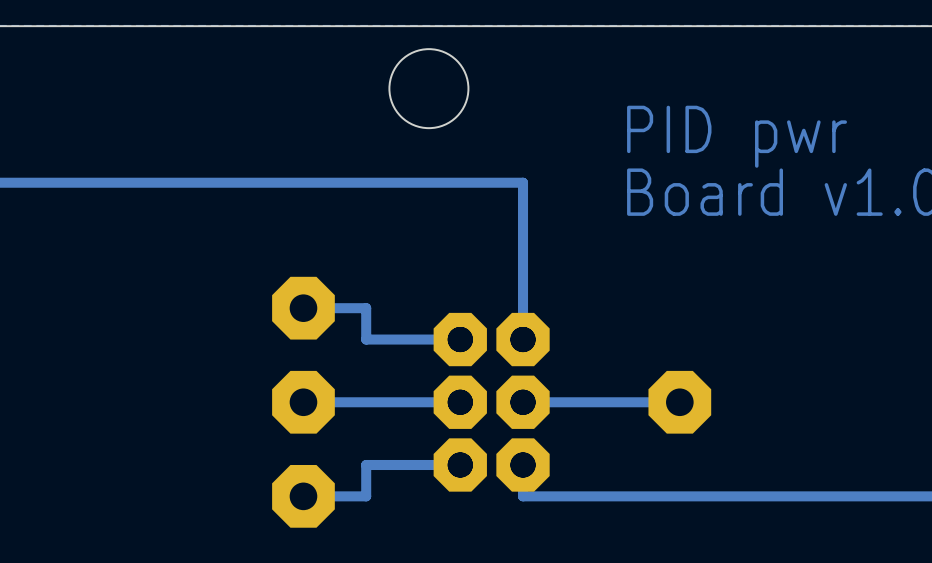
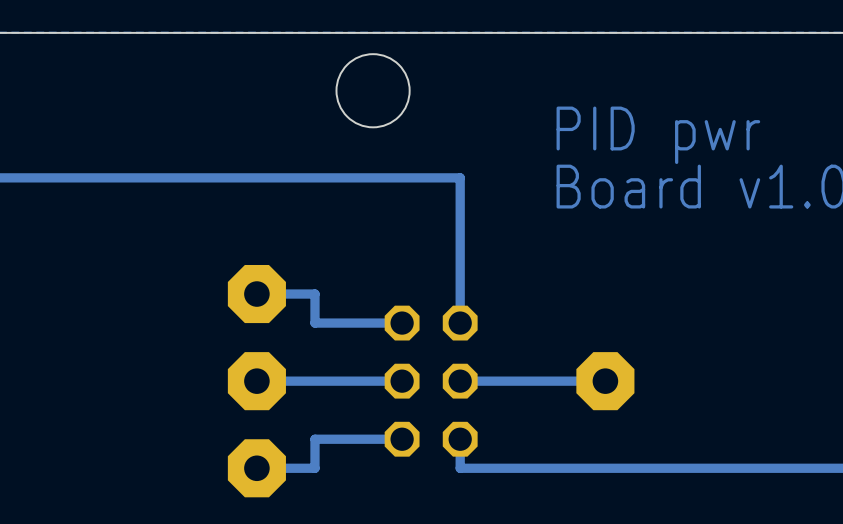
part: (460, 339) -> none
part: (523, 339) -> none
part: (460, 402) -> none
part: (523, 402) -> none
part: (460, 464) -> none
part: (523, 464) -> none

